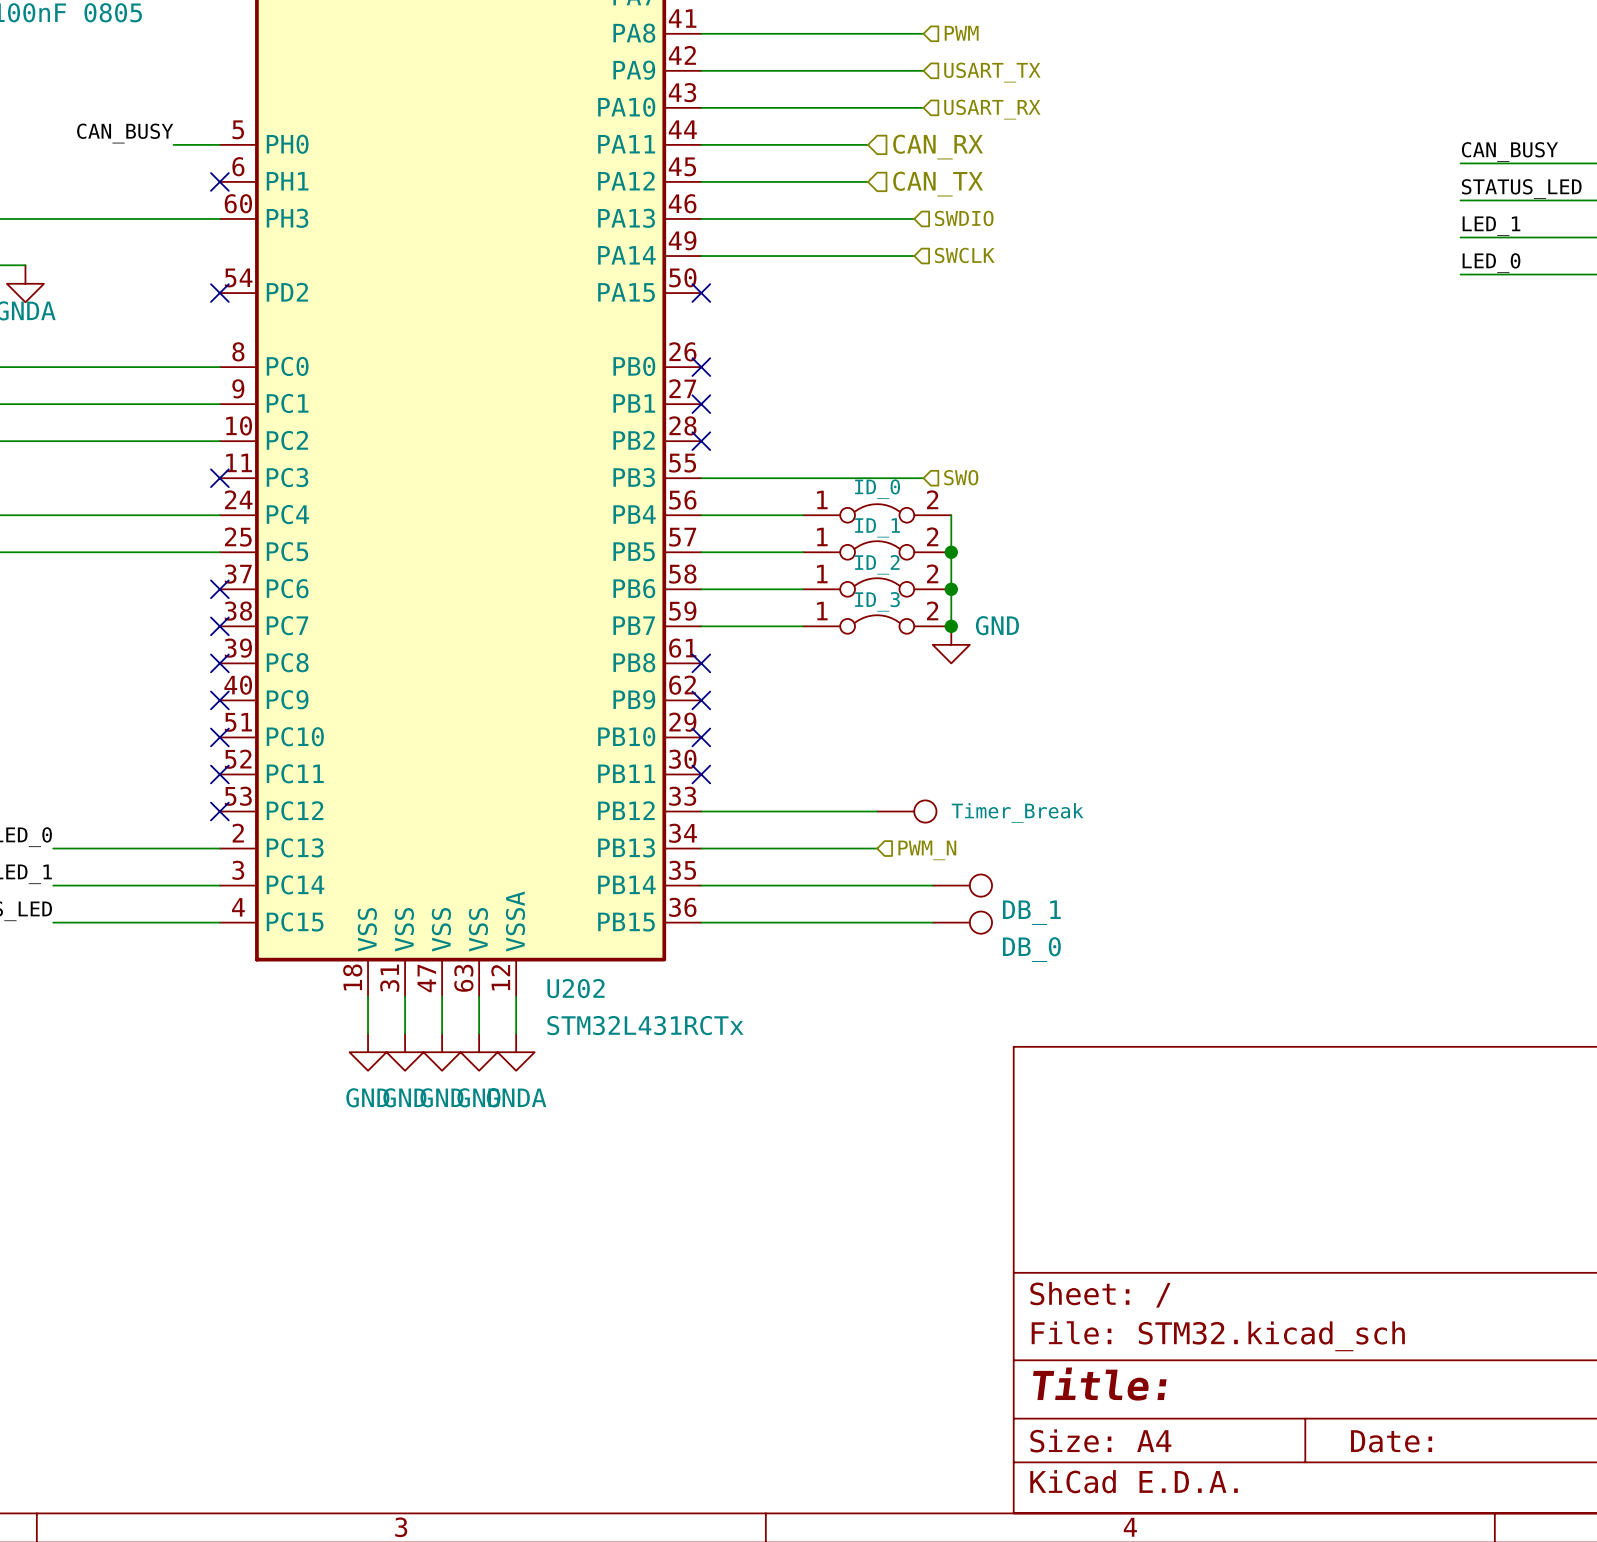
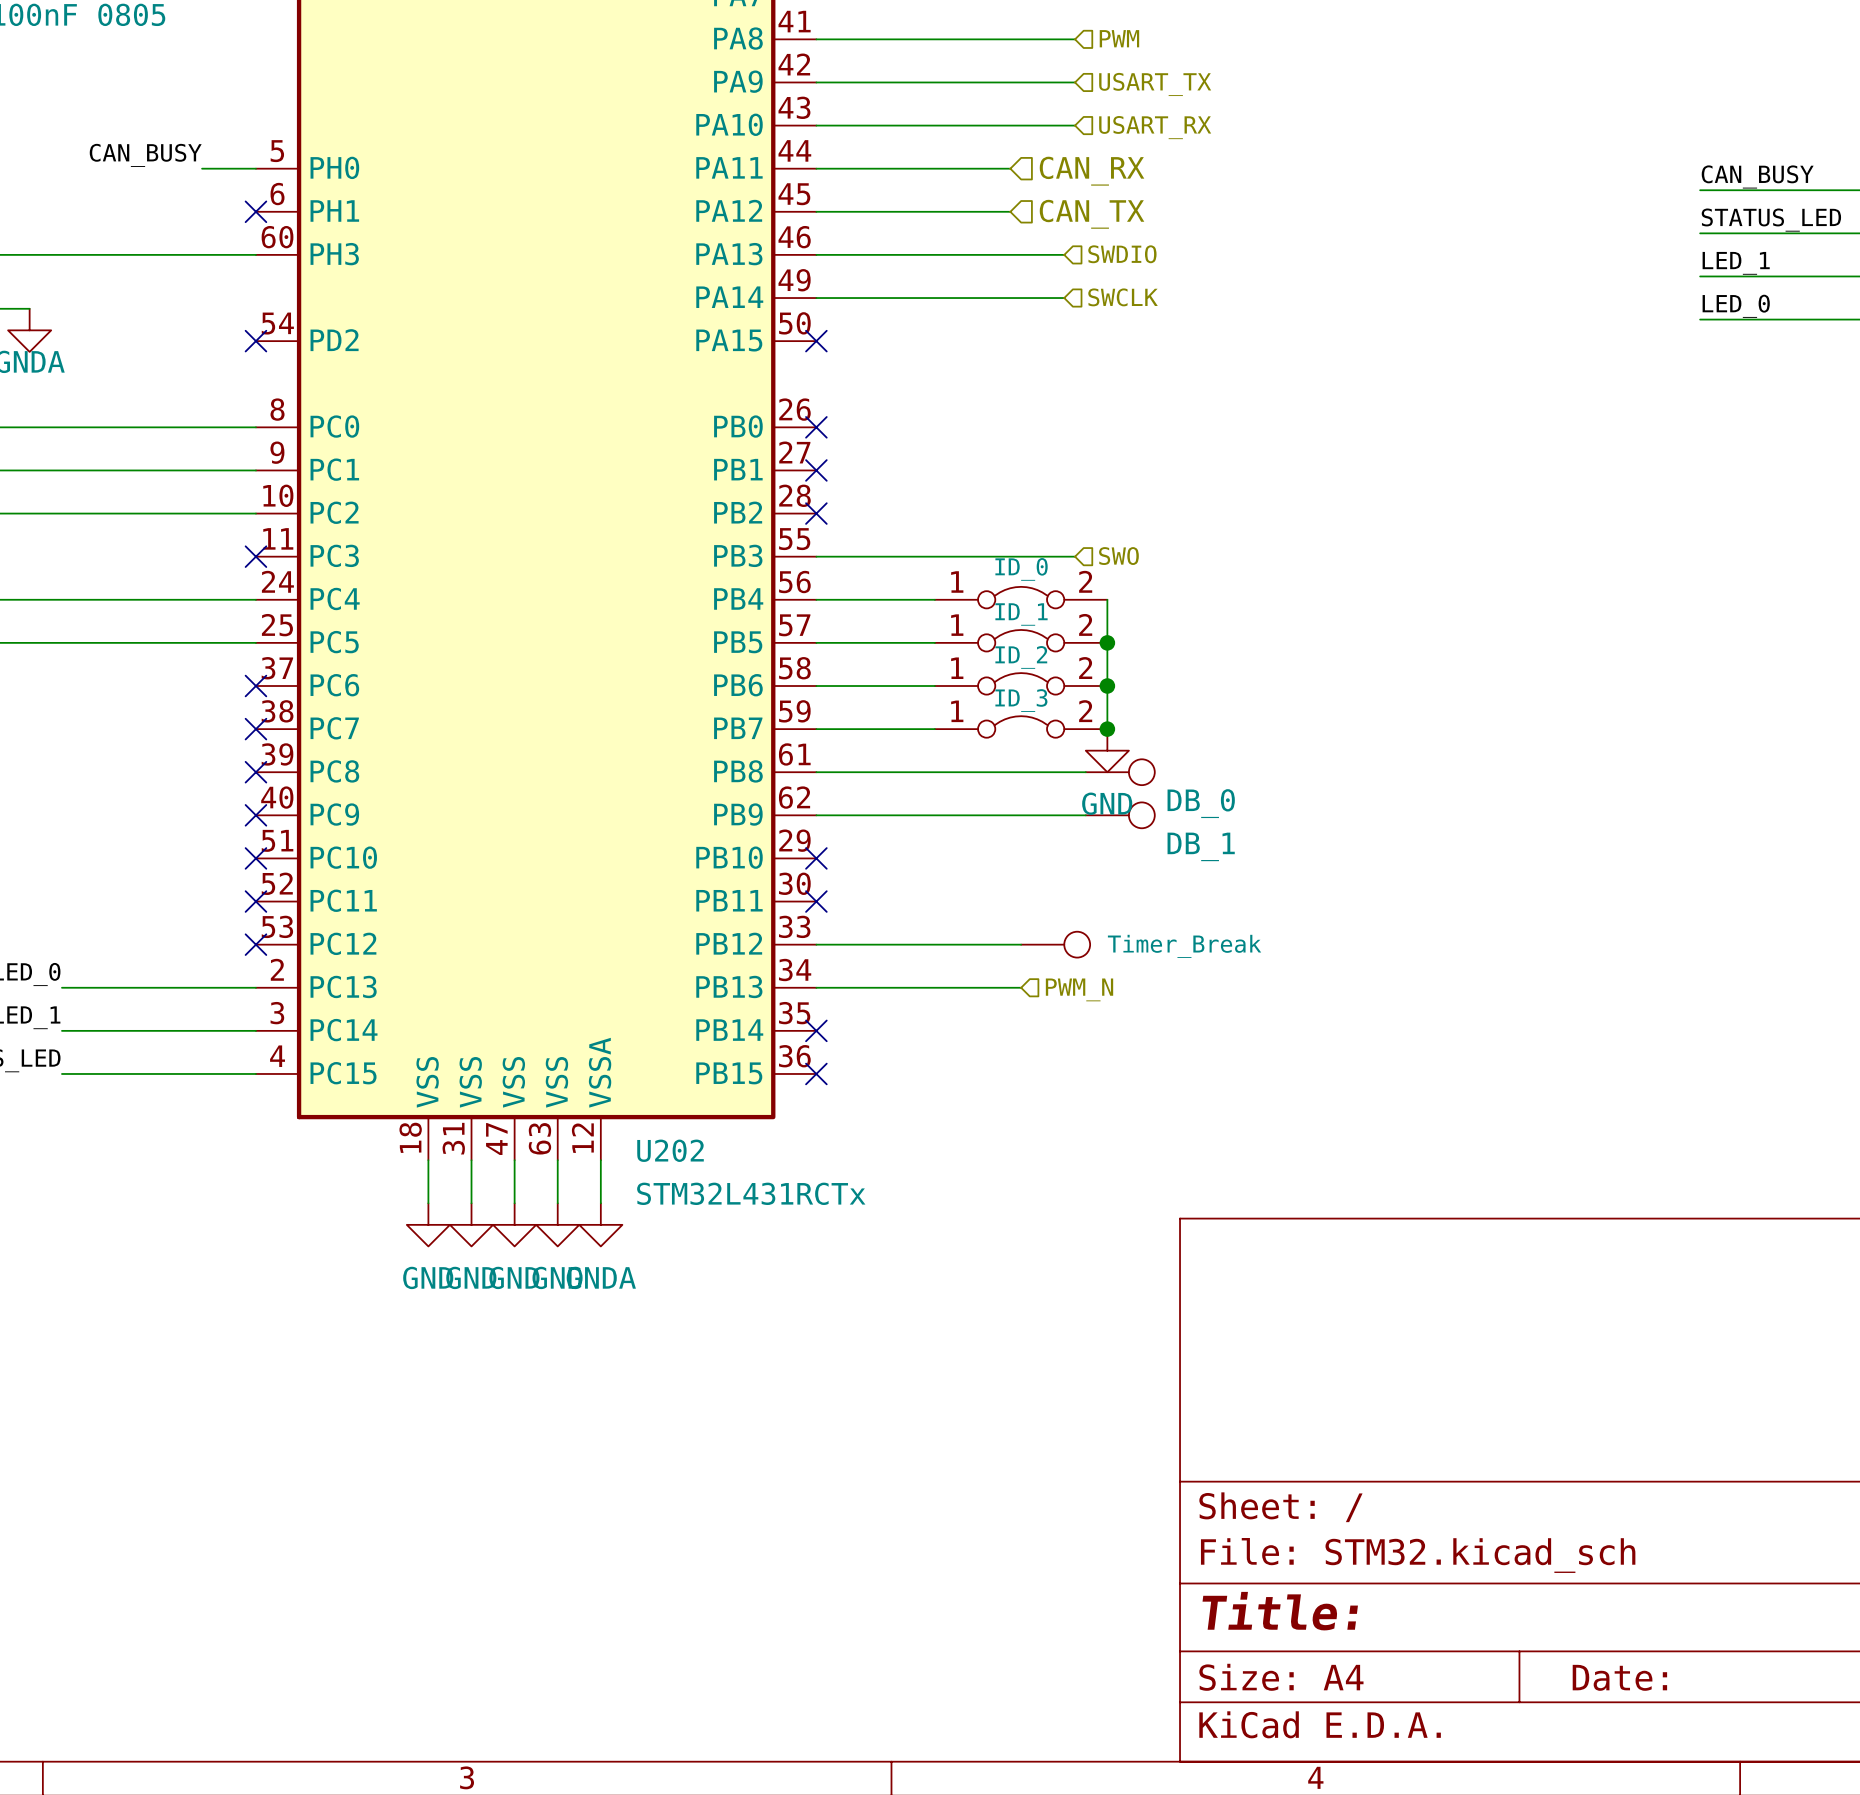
power symbol text position: GND (997, 625) -> GND (1107, 803)
no-connect mark: (701, 663) -> none
no-connect mark: (701, 700) -> none
wire: (701, 885) (932, 885) -> (816, 815) (1085, 815)
no-connect mark: none -> (816, 1030)
part position: (962, 885) -> (1120, 815)
wire: (701, 922) (932, 922) -> (816, 772) (1085, 772)
no-connect mark: none -> (816, 1073)
part position: (962, 922) -> (1120, 772)

